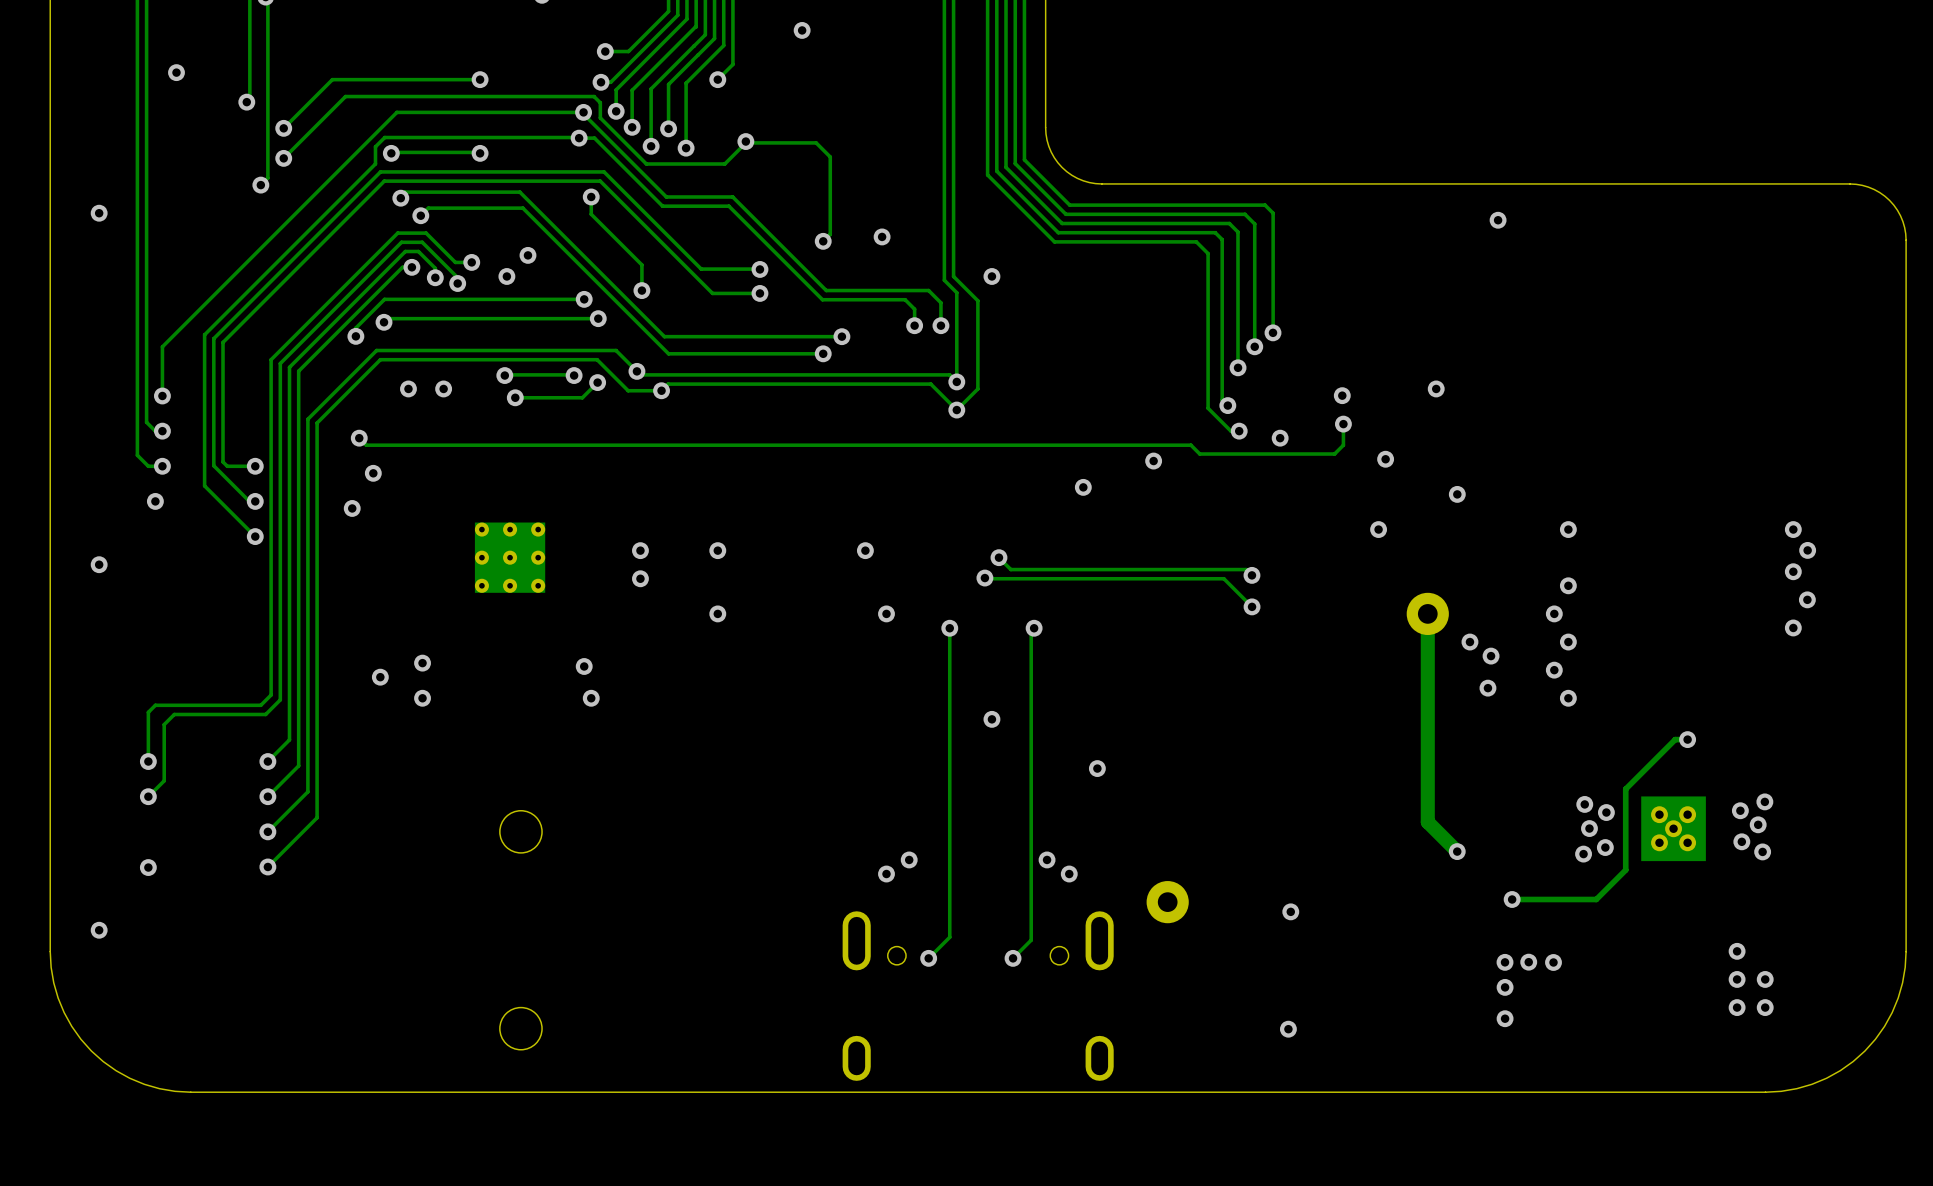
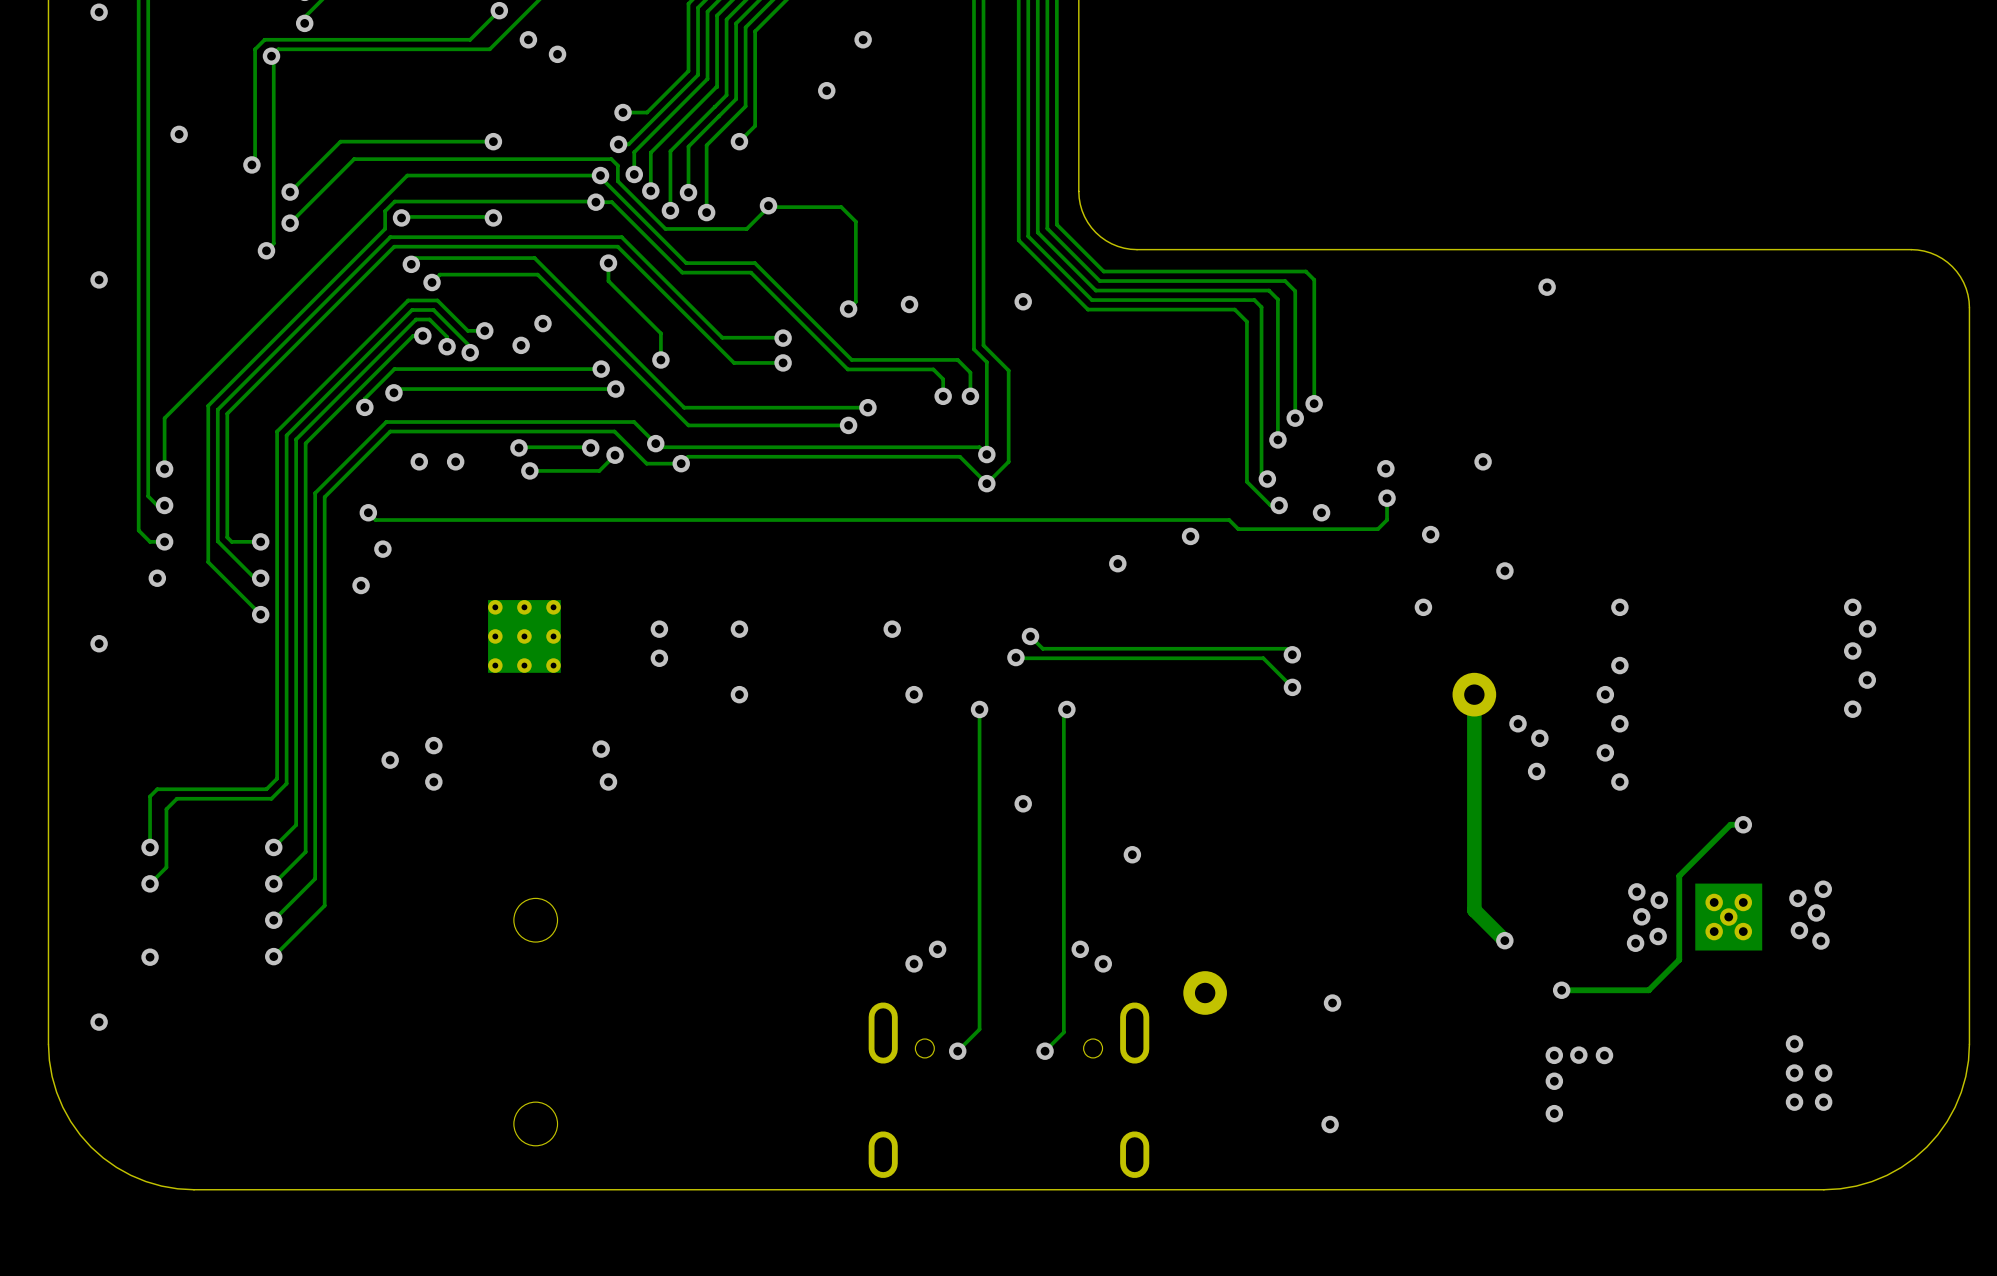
via position: (991, 276) -> (1023, 301)

